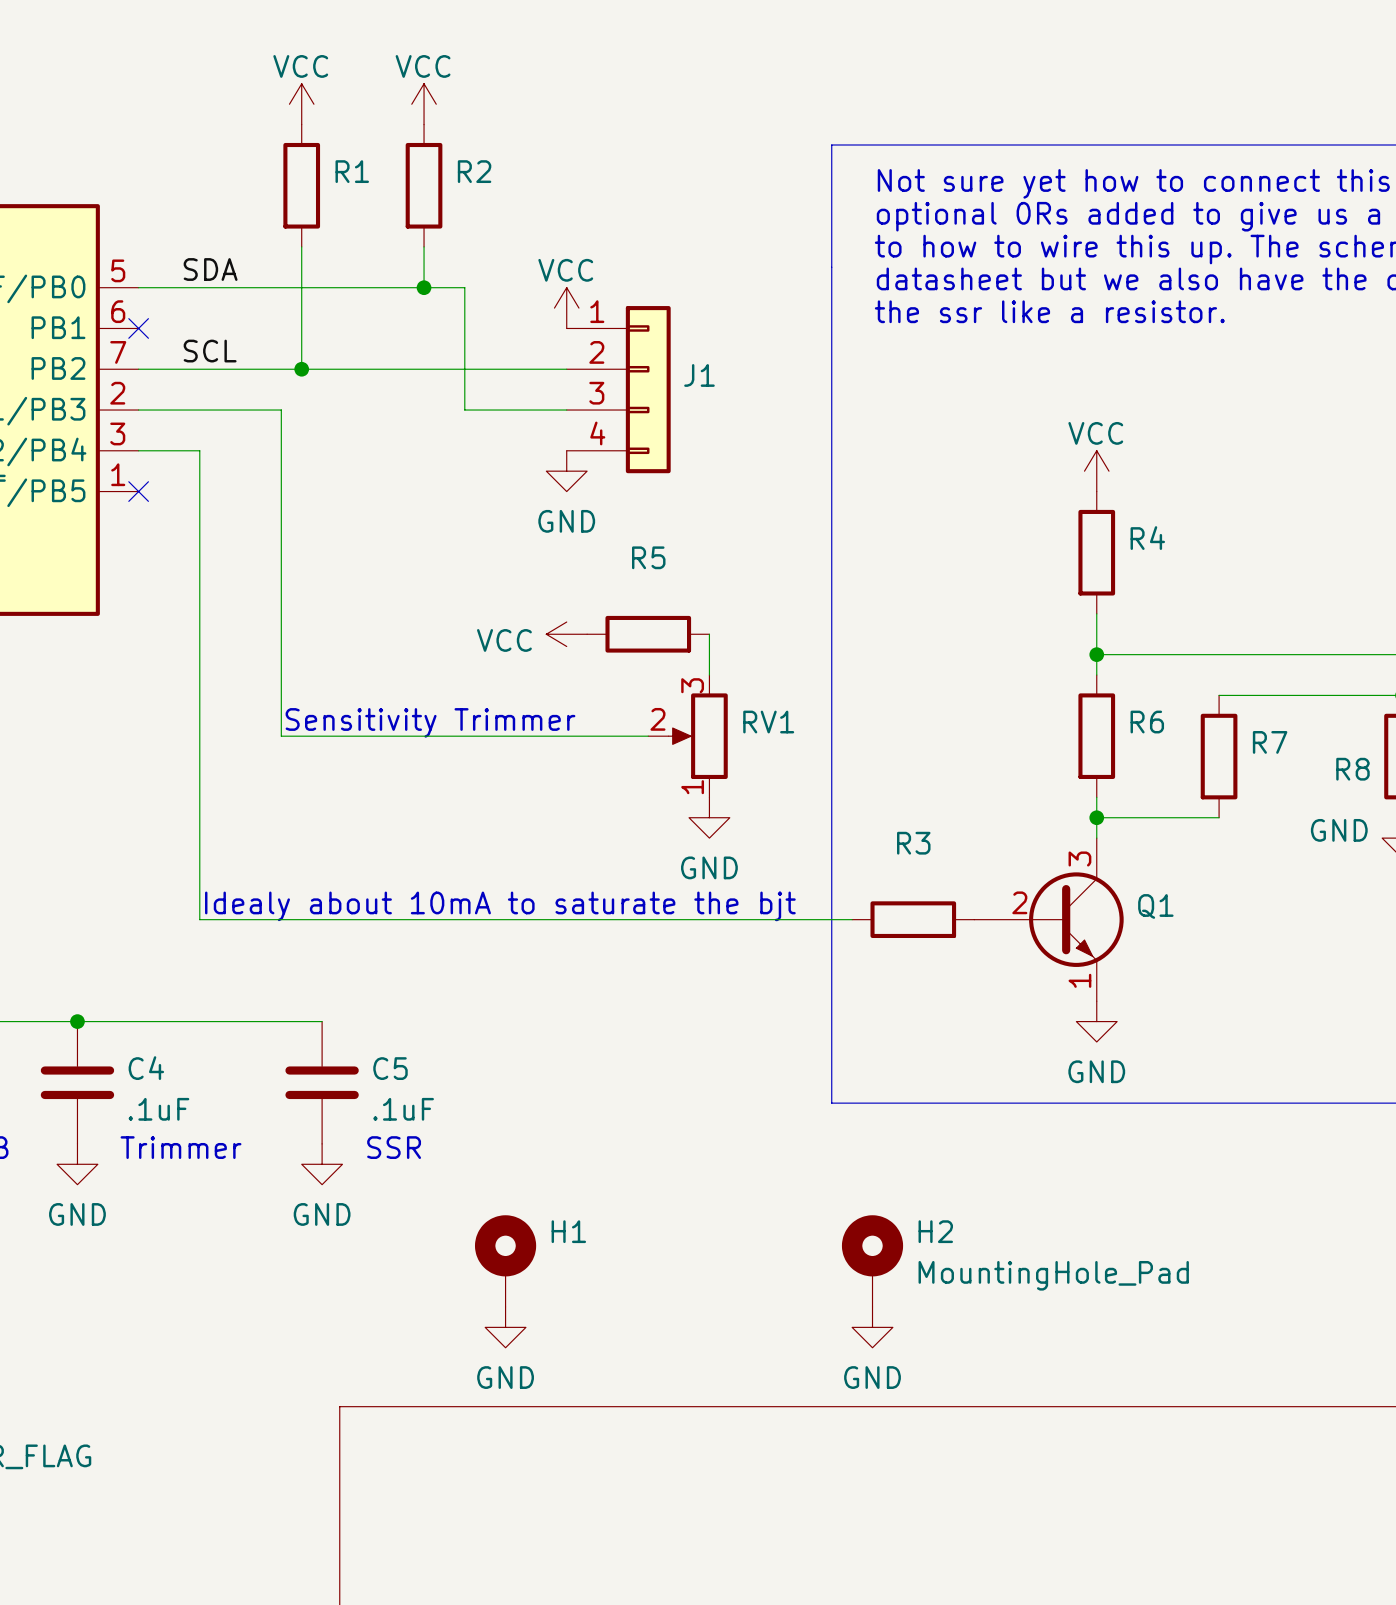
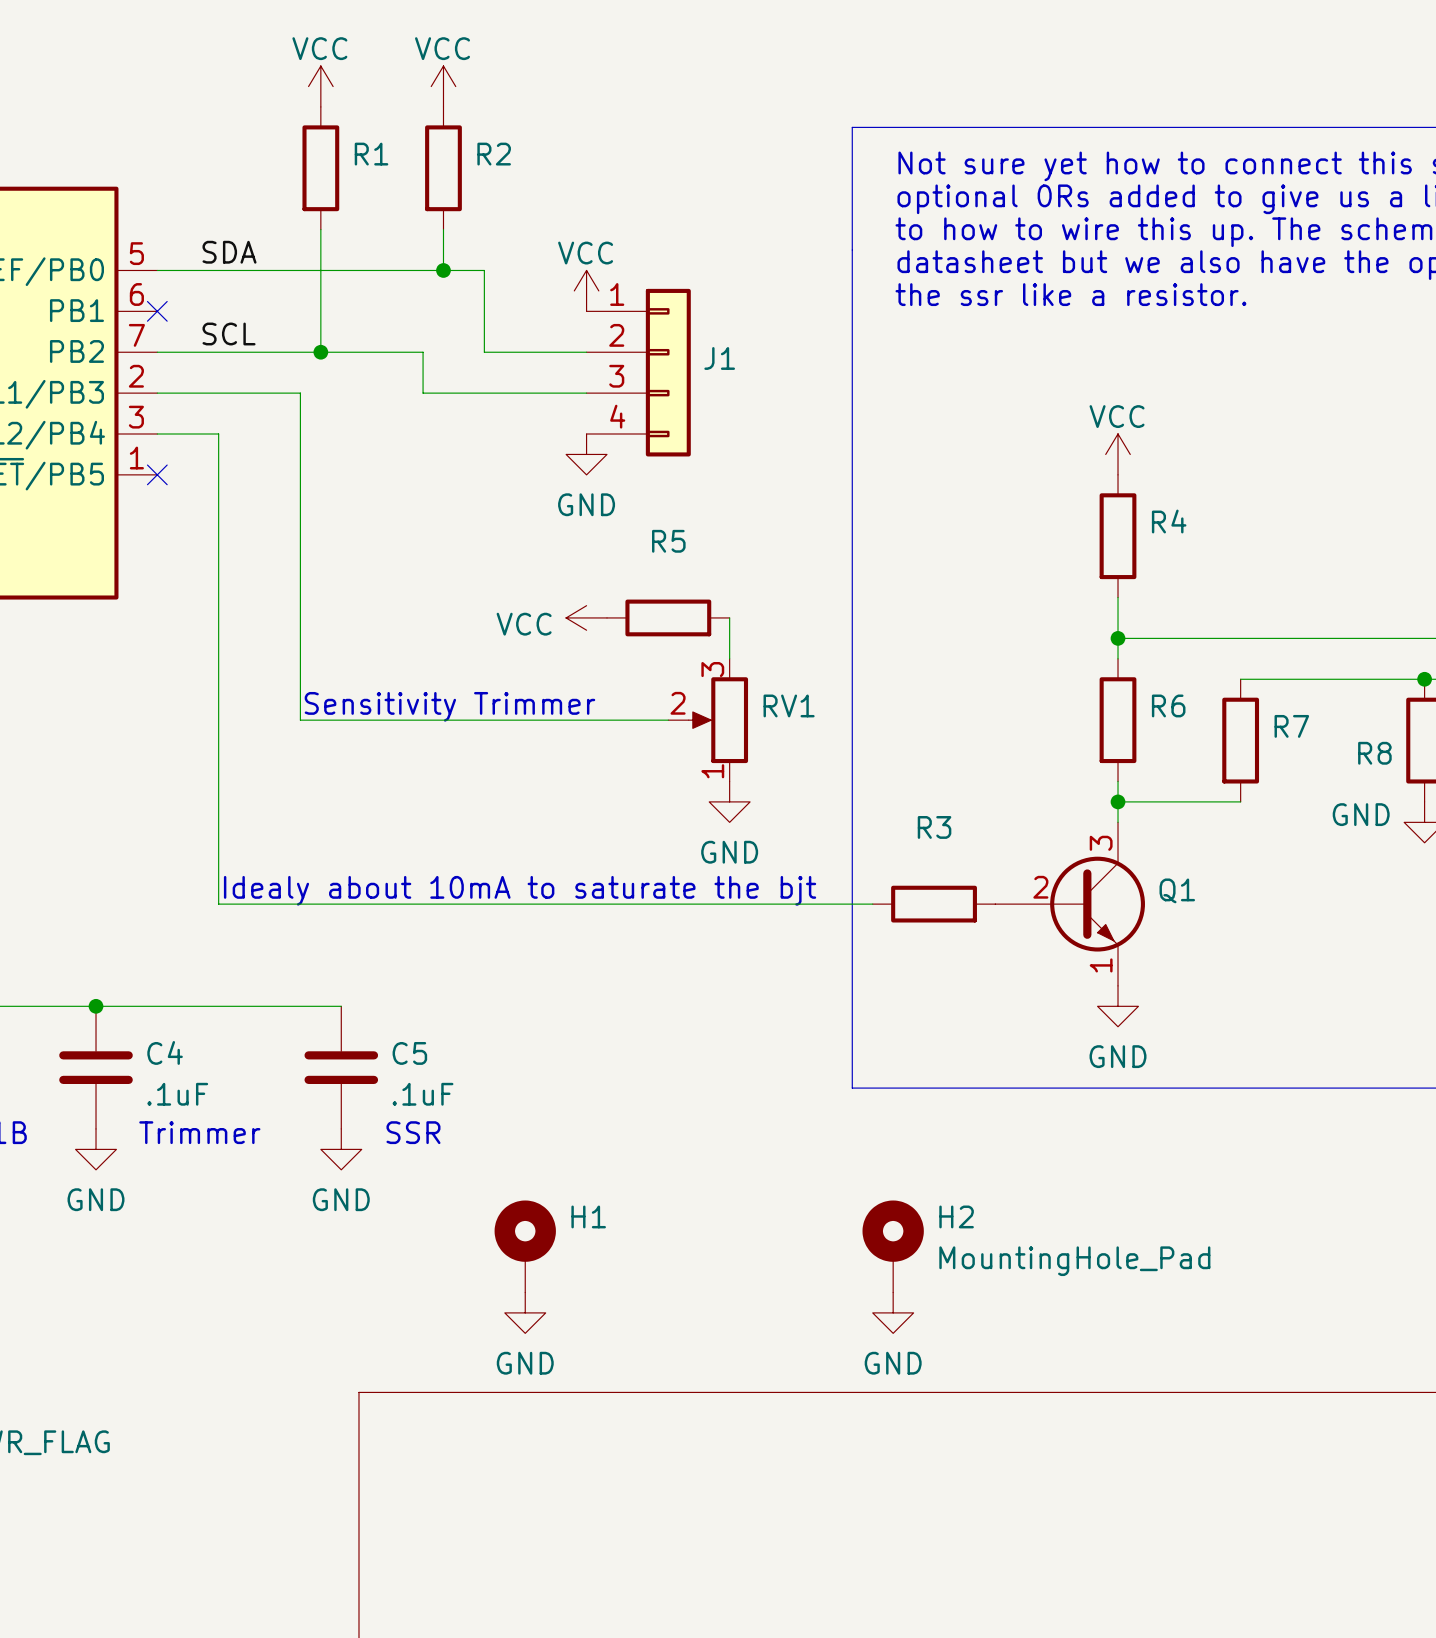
wire: (403, 369) (464, 369) (464, 410) -> (423, 352) (423, 393) (484, 393)

